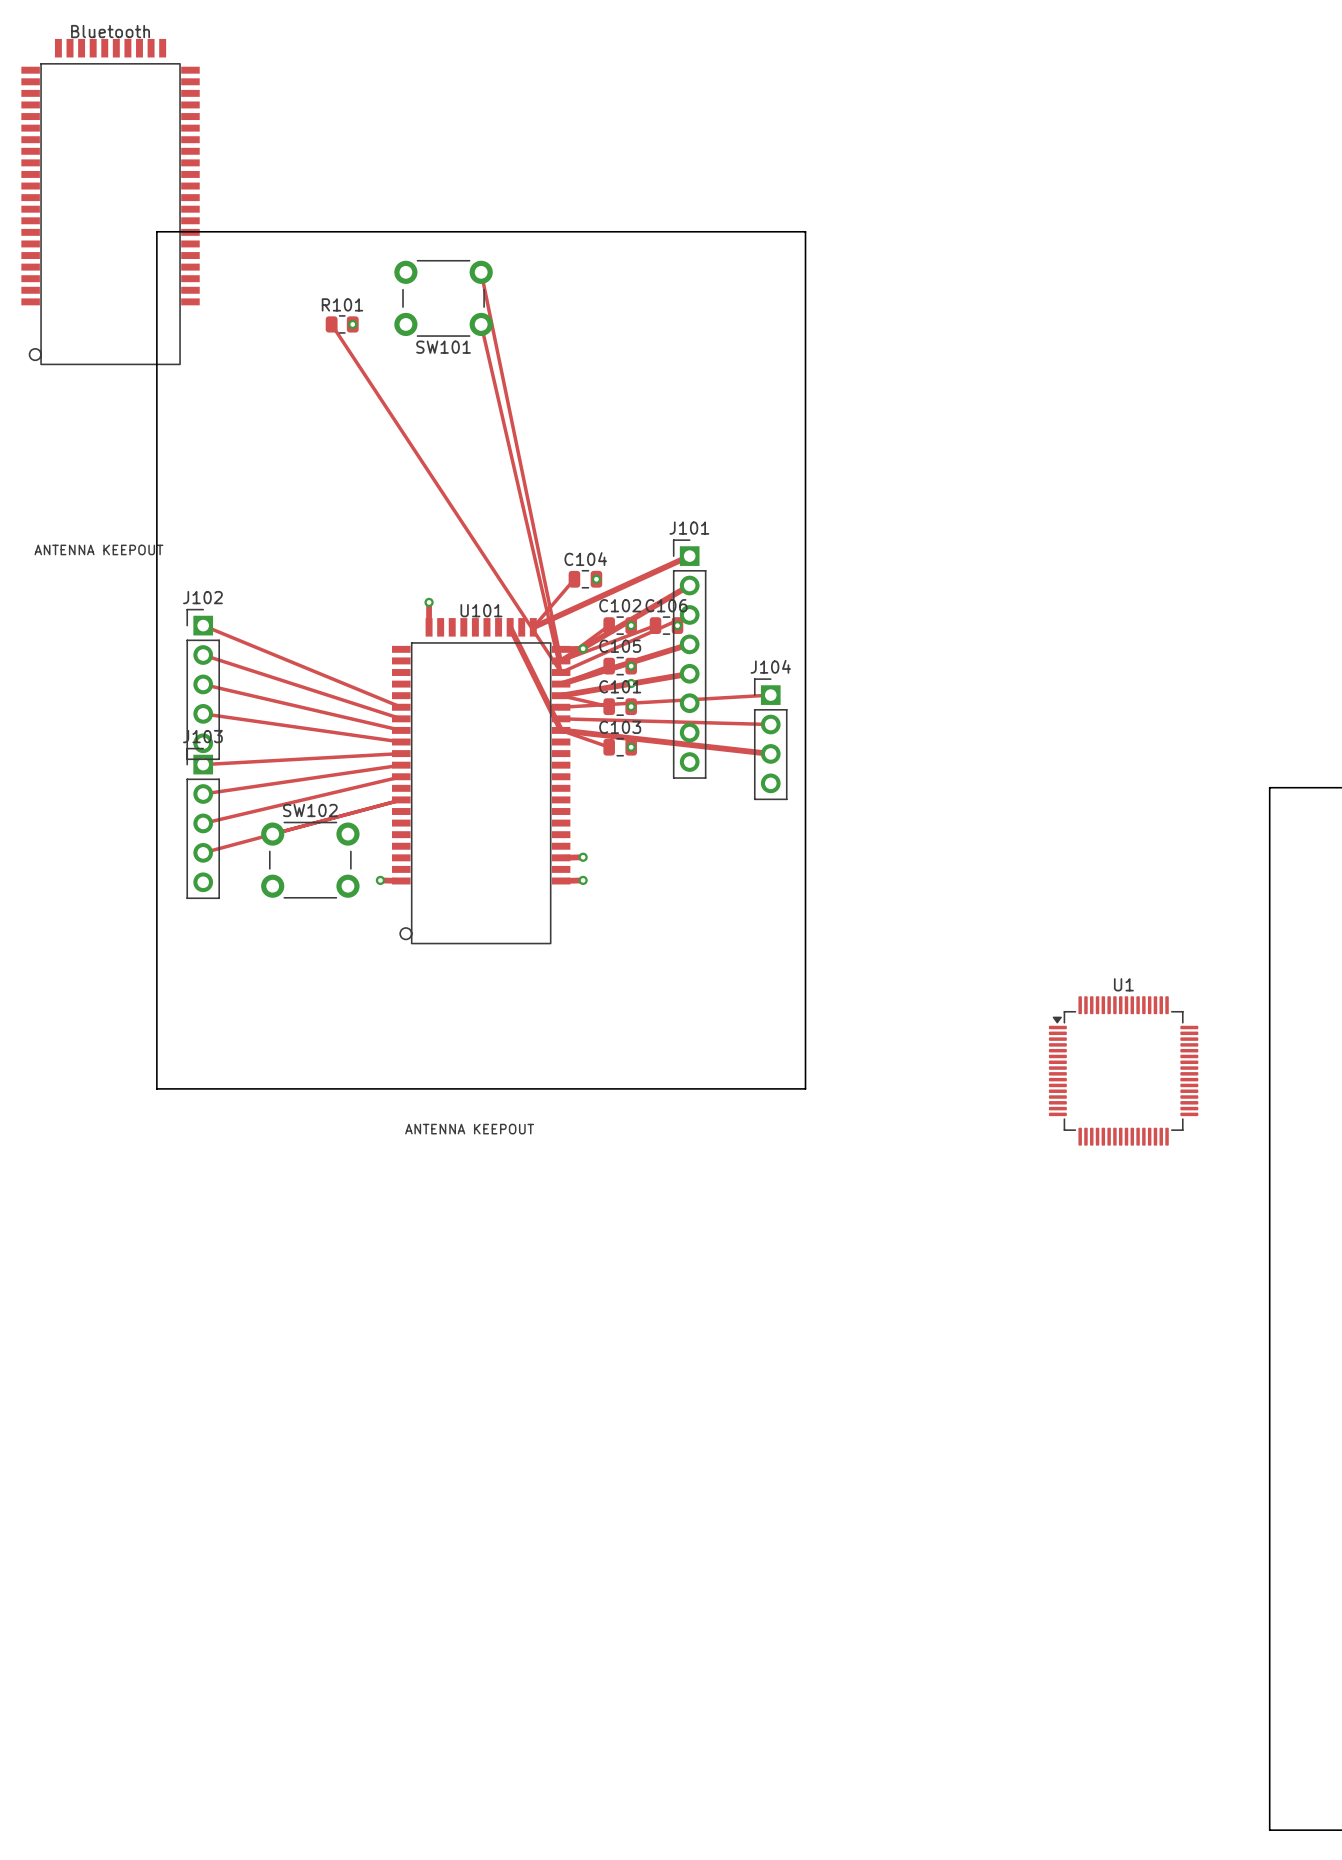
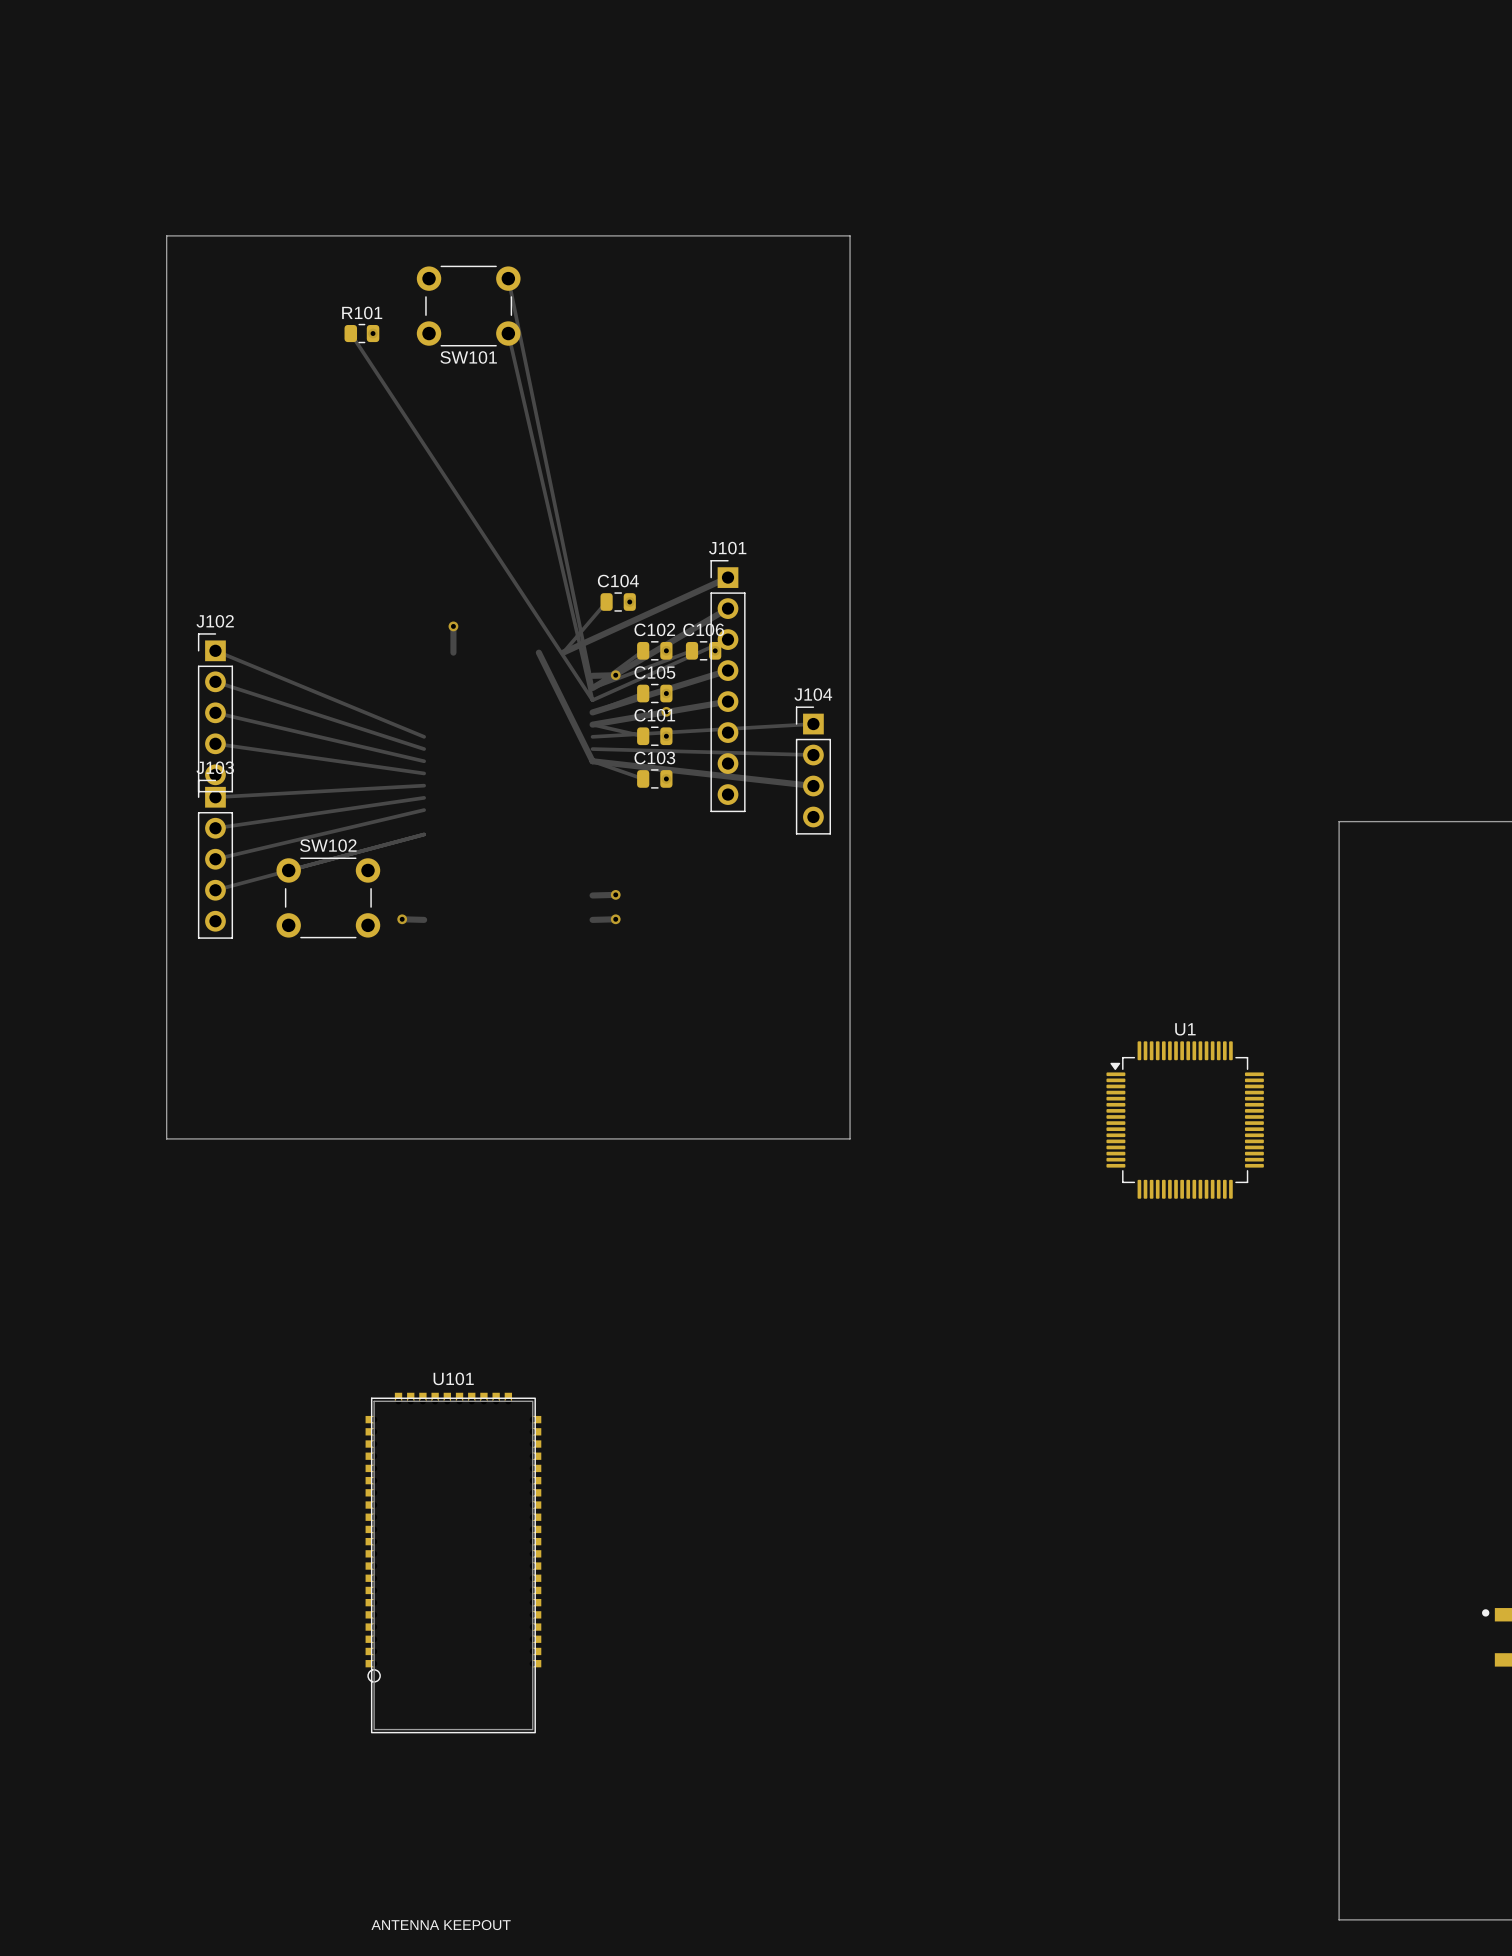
Bluetooth: (110, 202) -> none
U101 footprint: [392, 618, 571, 945] -> [365, 1392, 542, 1734]

